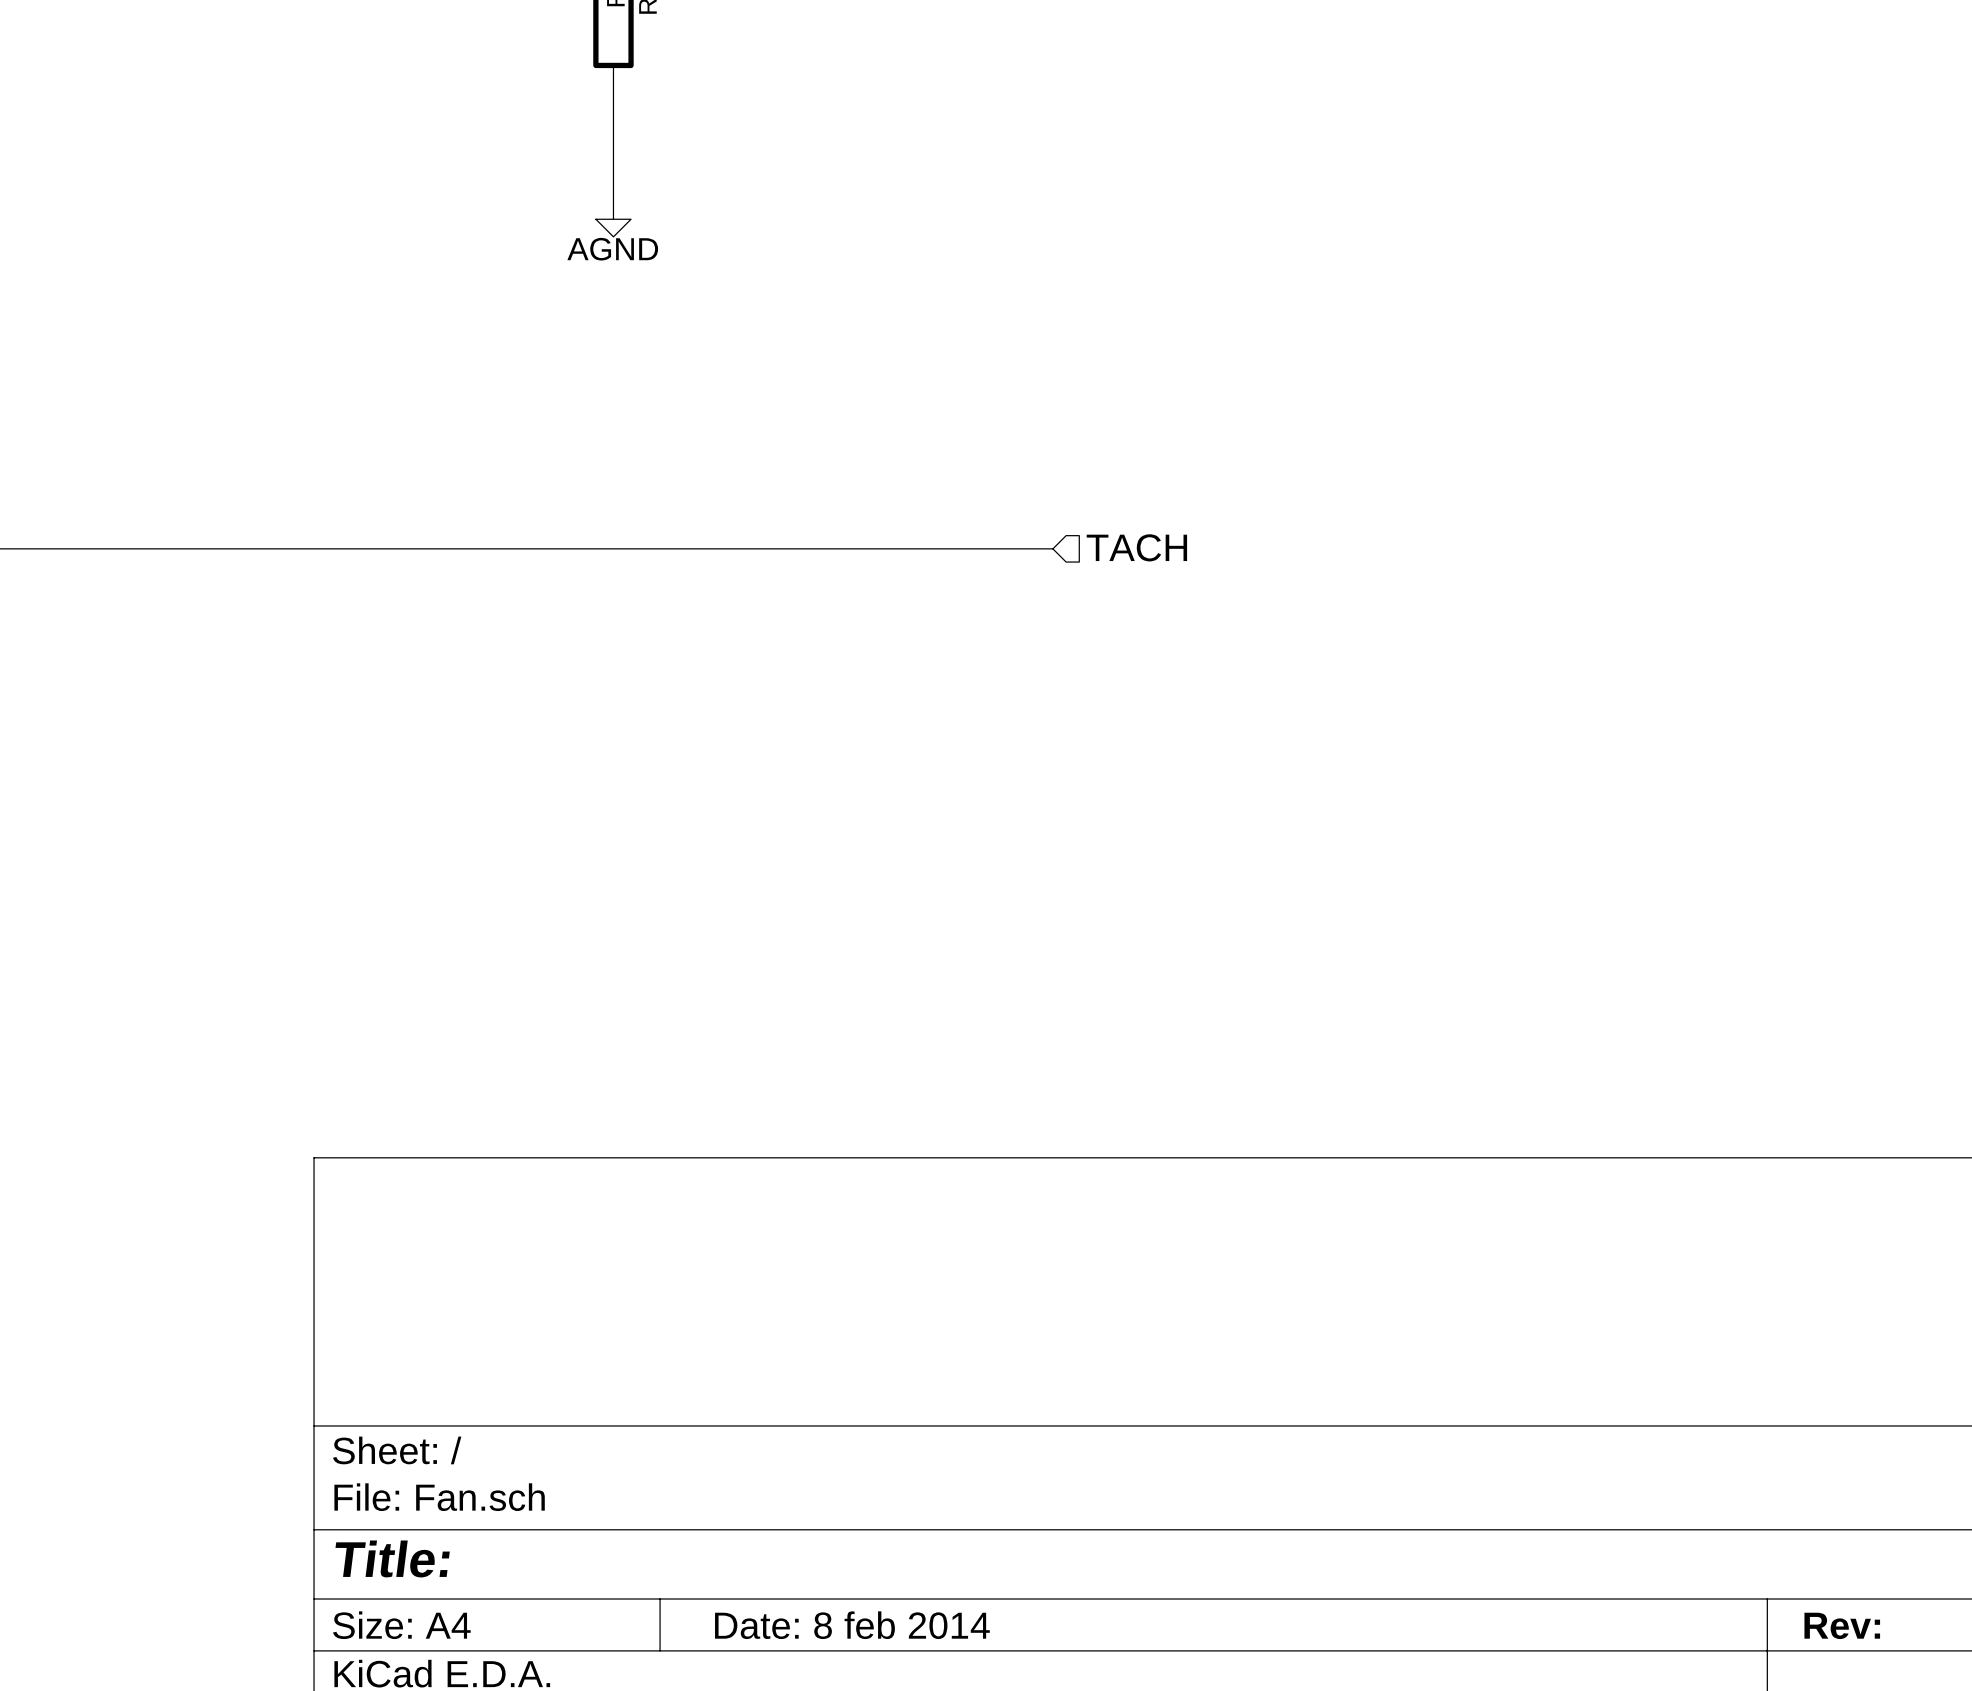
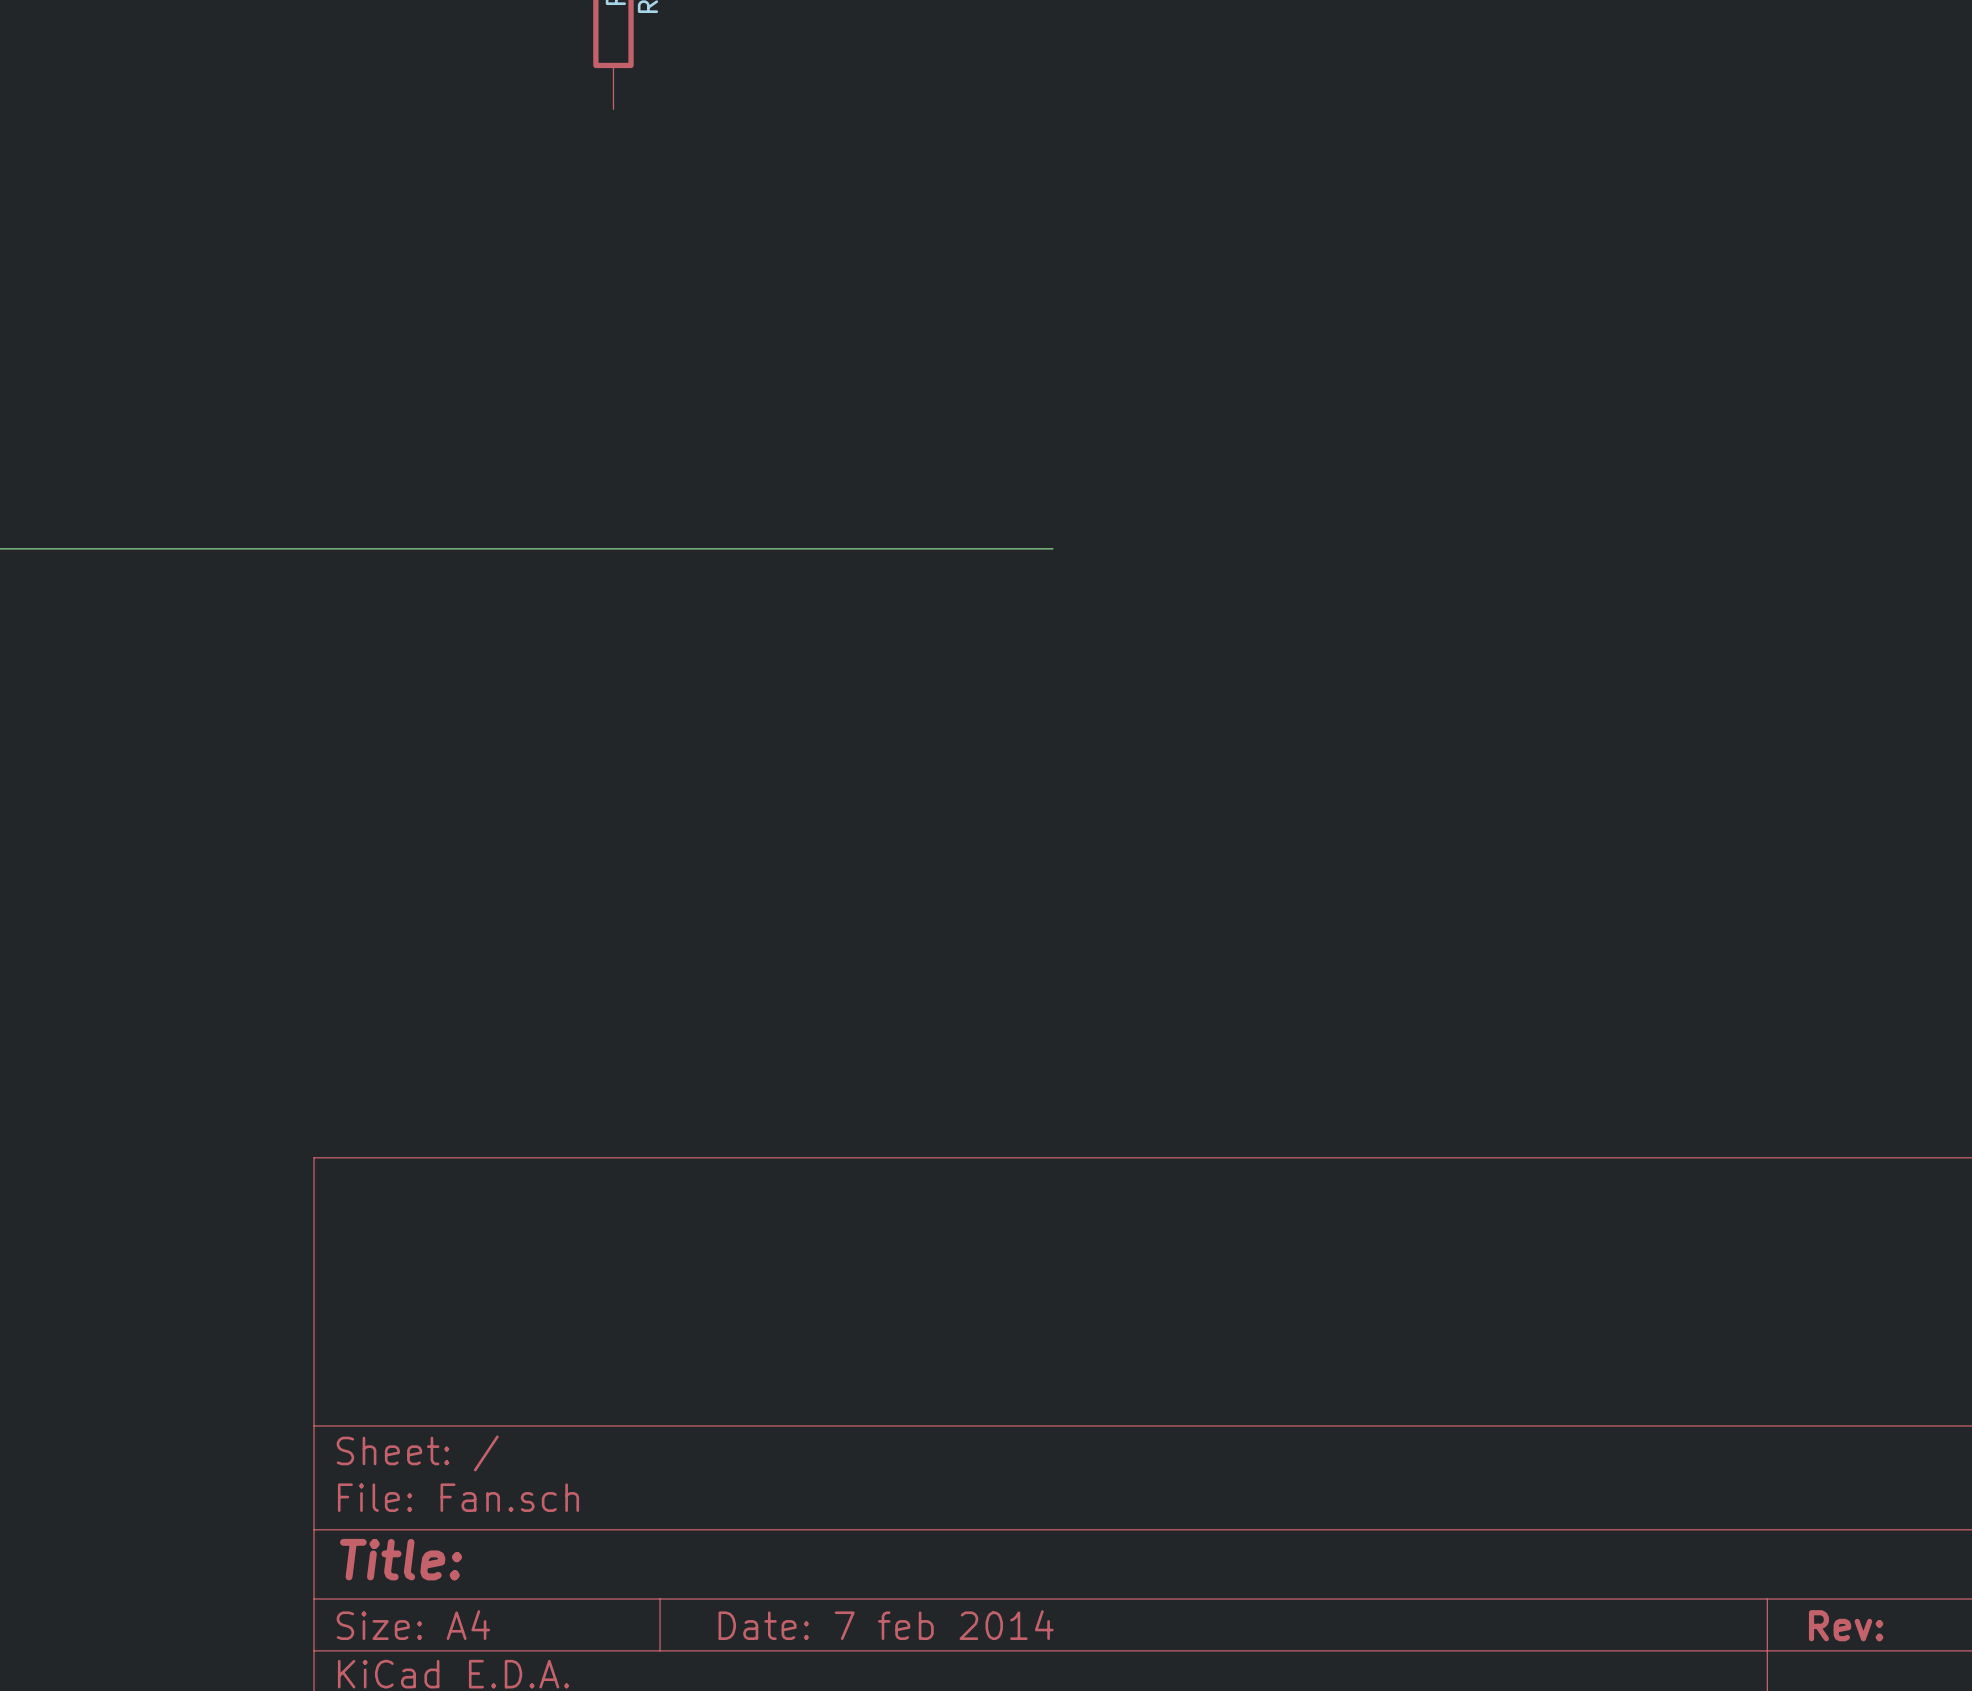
wire: (613, 109) (613, 219) -> none
power symbol: AGND (613, 228) -> none
hierarchical label: TACH (1136, 547) -> none
title block: Date: 8 feb 2014 (852, 1625) -> Date: 7 feb 2014 (886, 1625)

